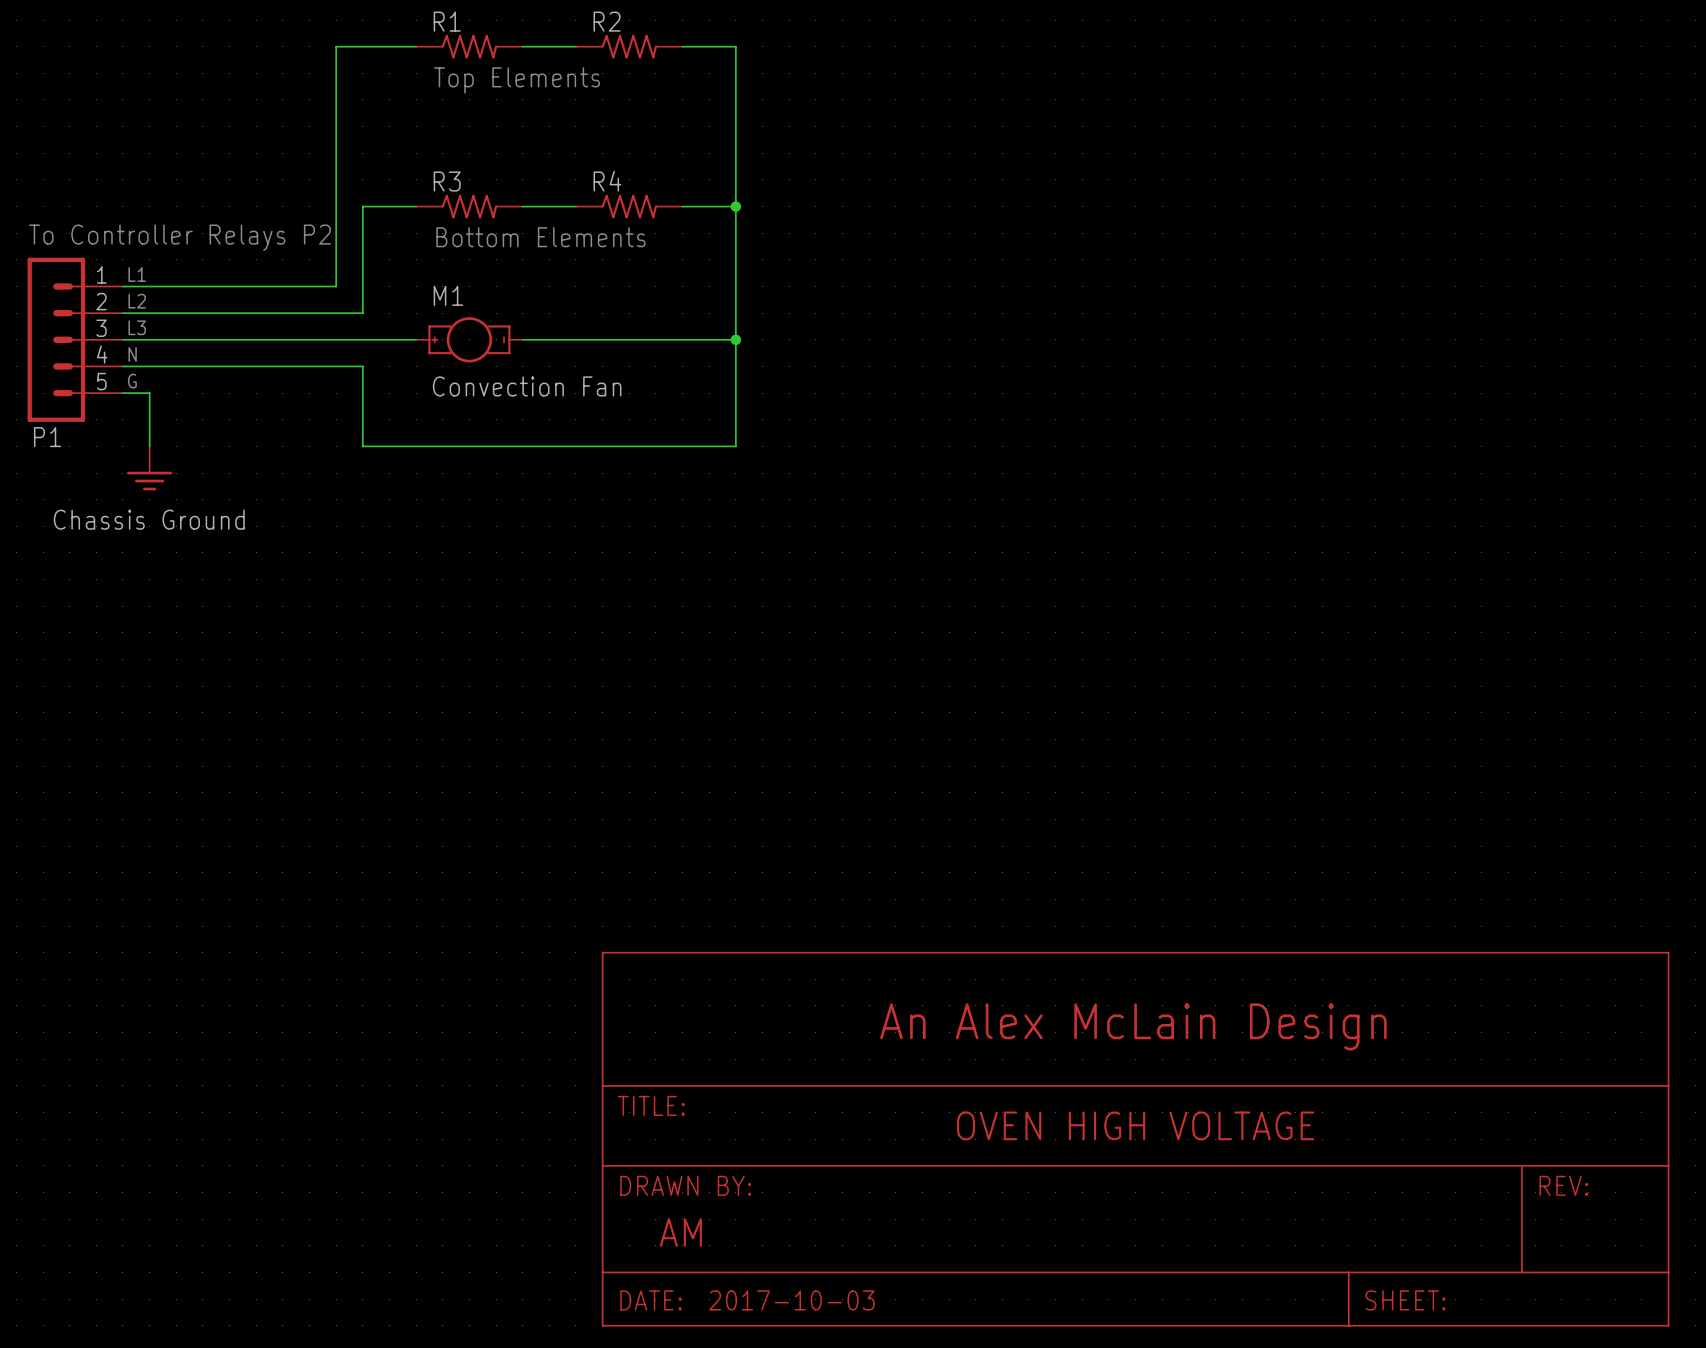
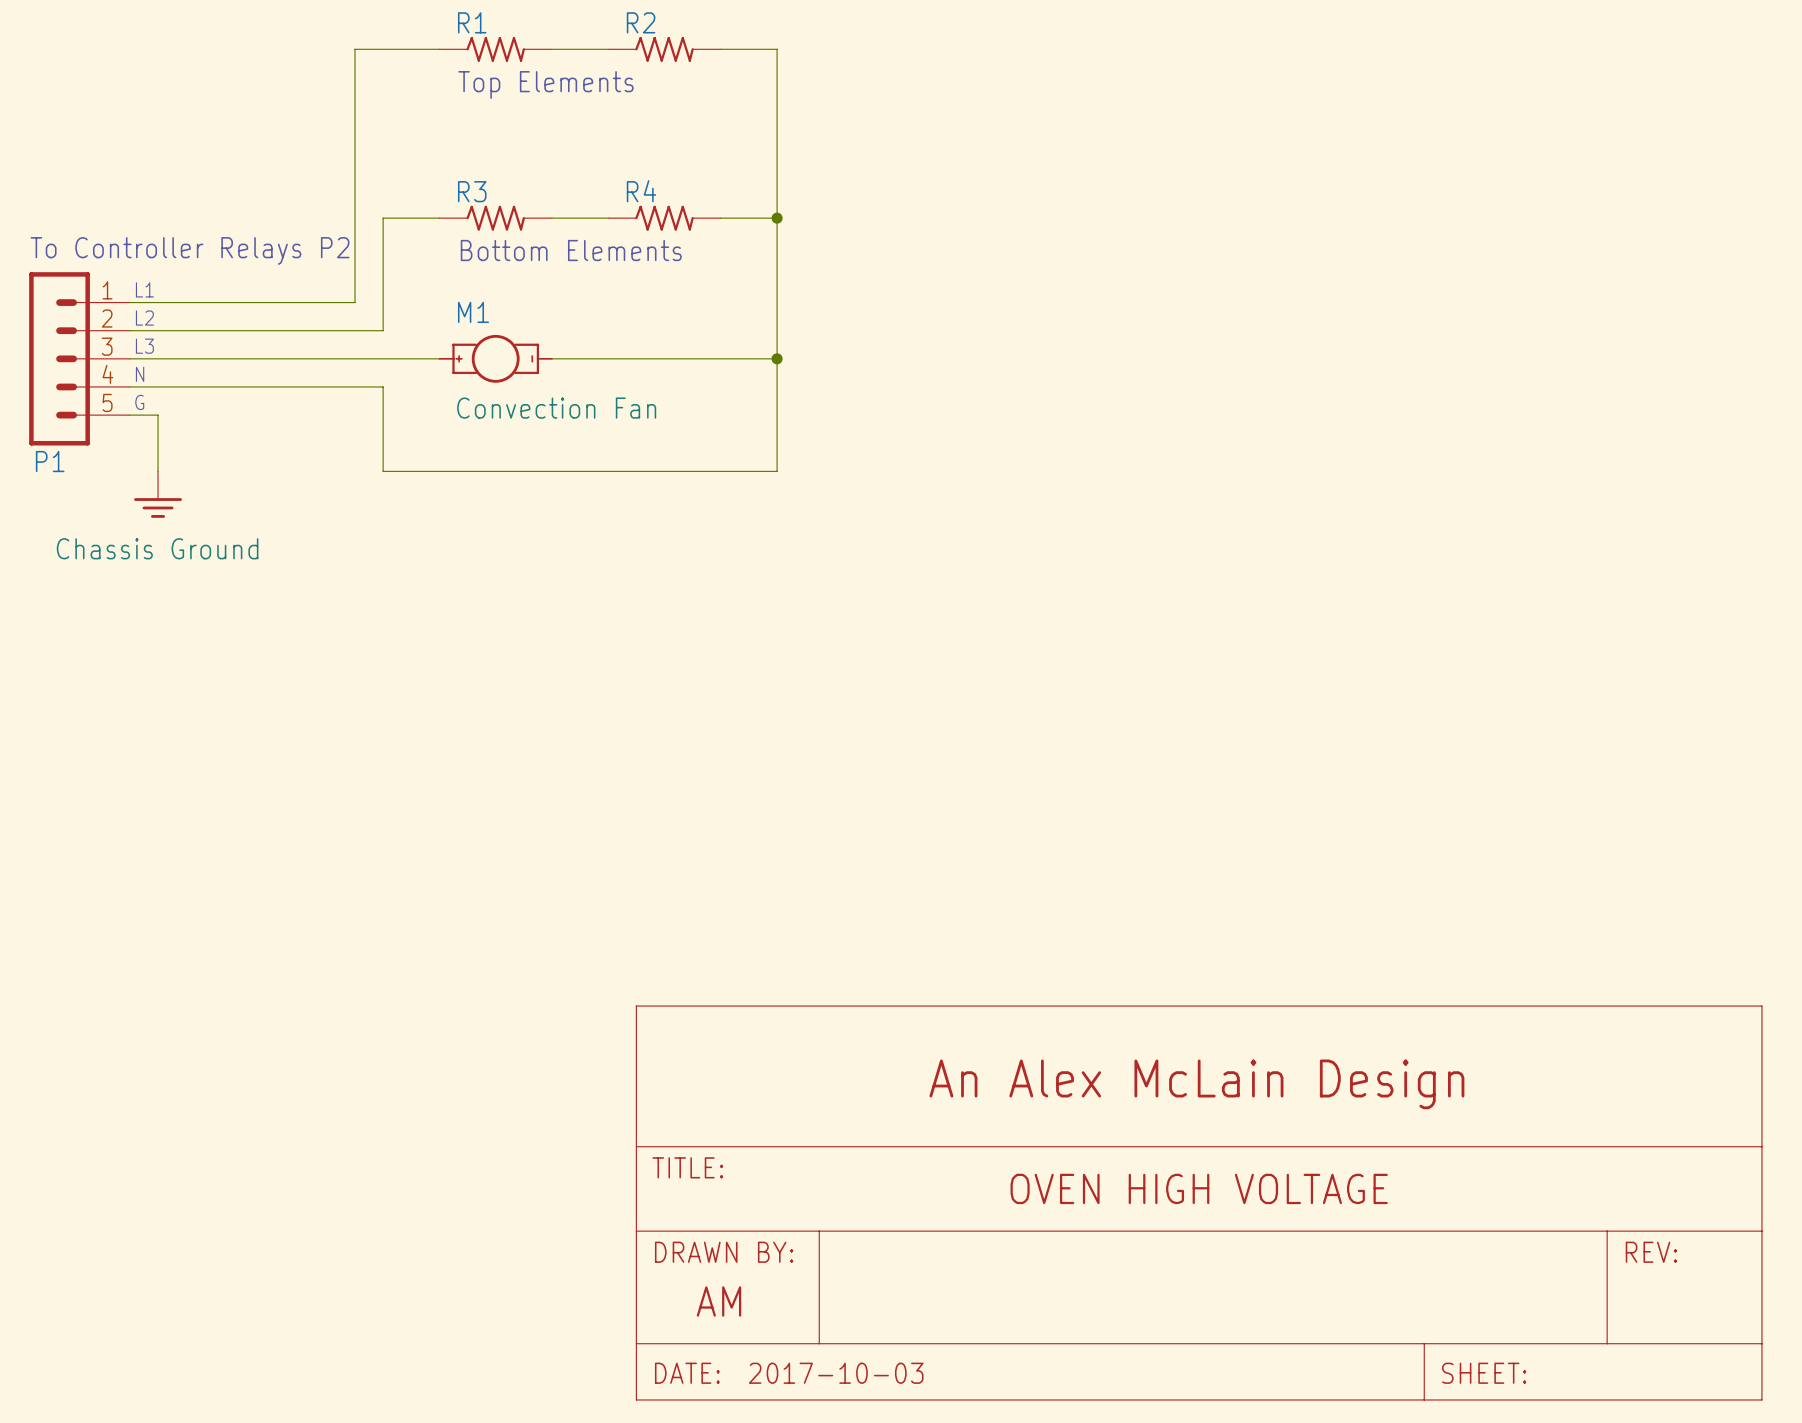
part symbol: [602, 952, 1670, 1327] -> [635, 1005, 1763, 1401]

